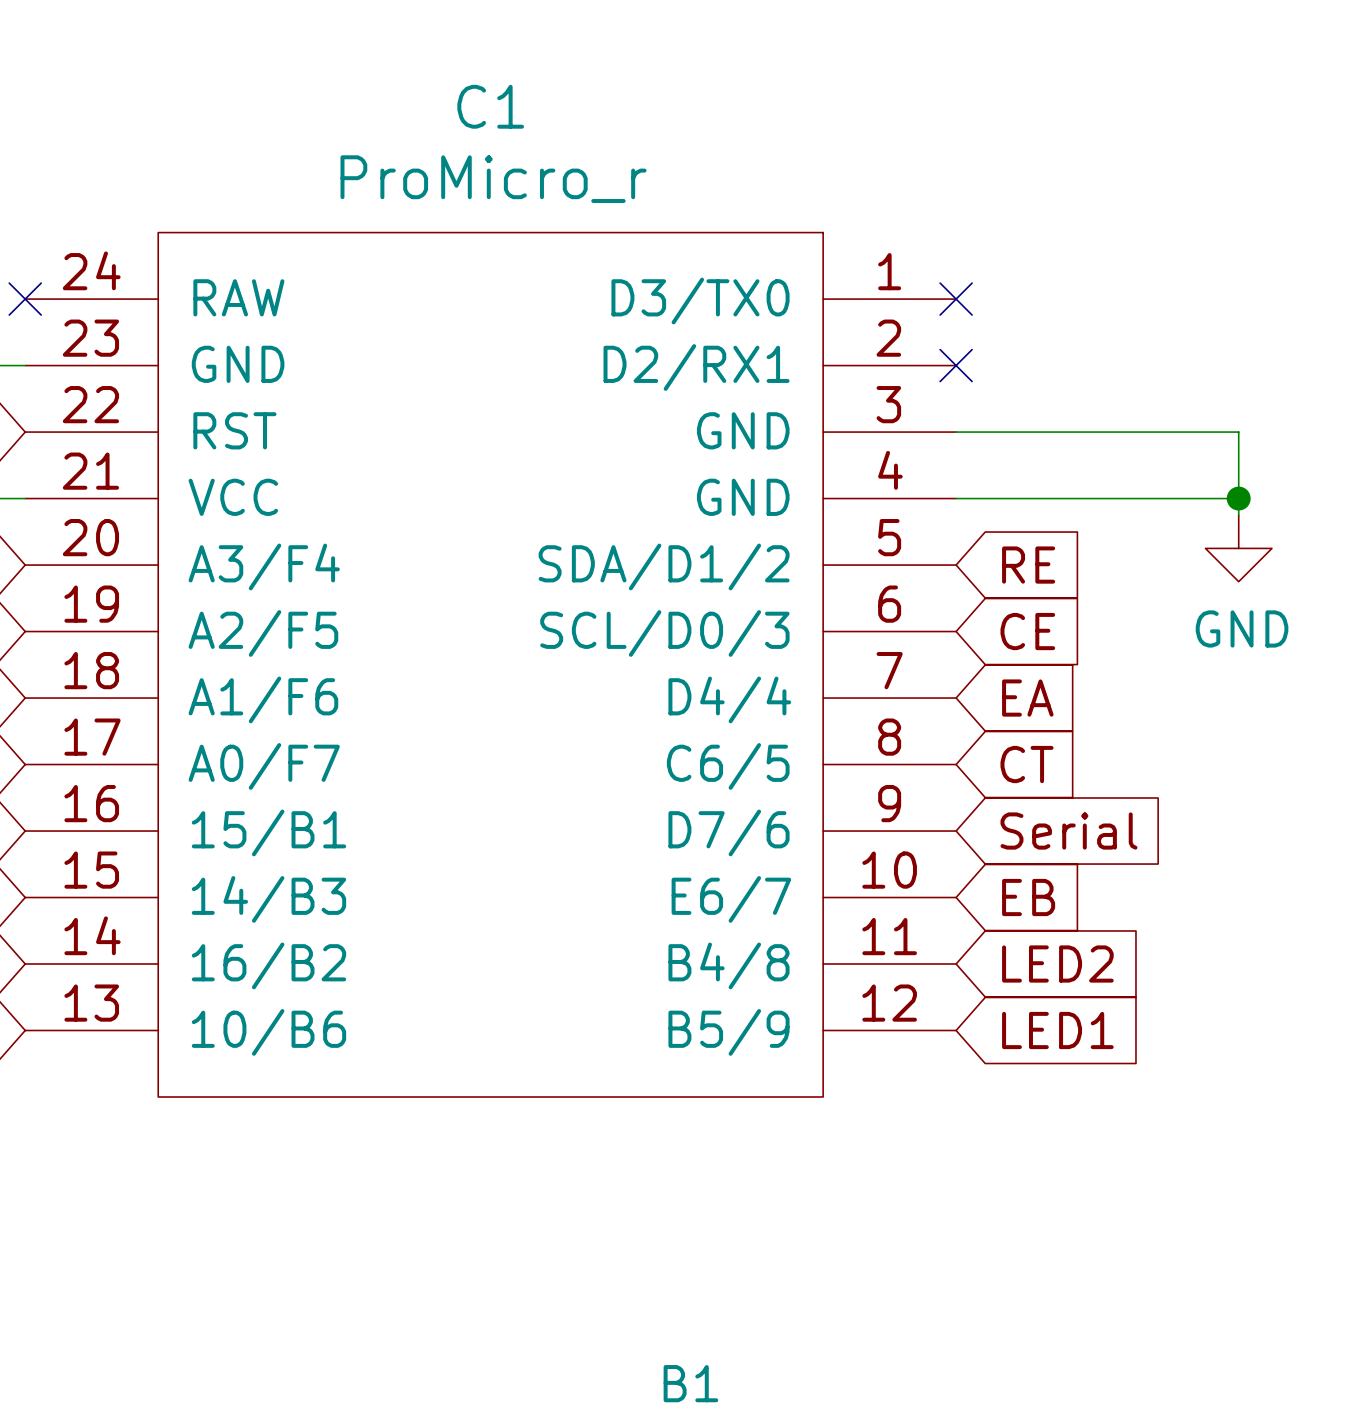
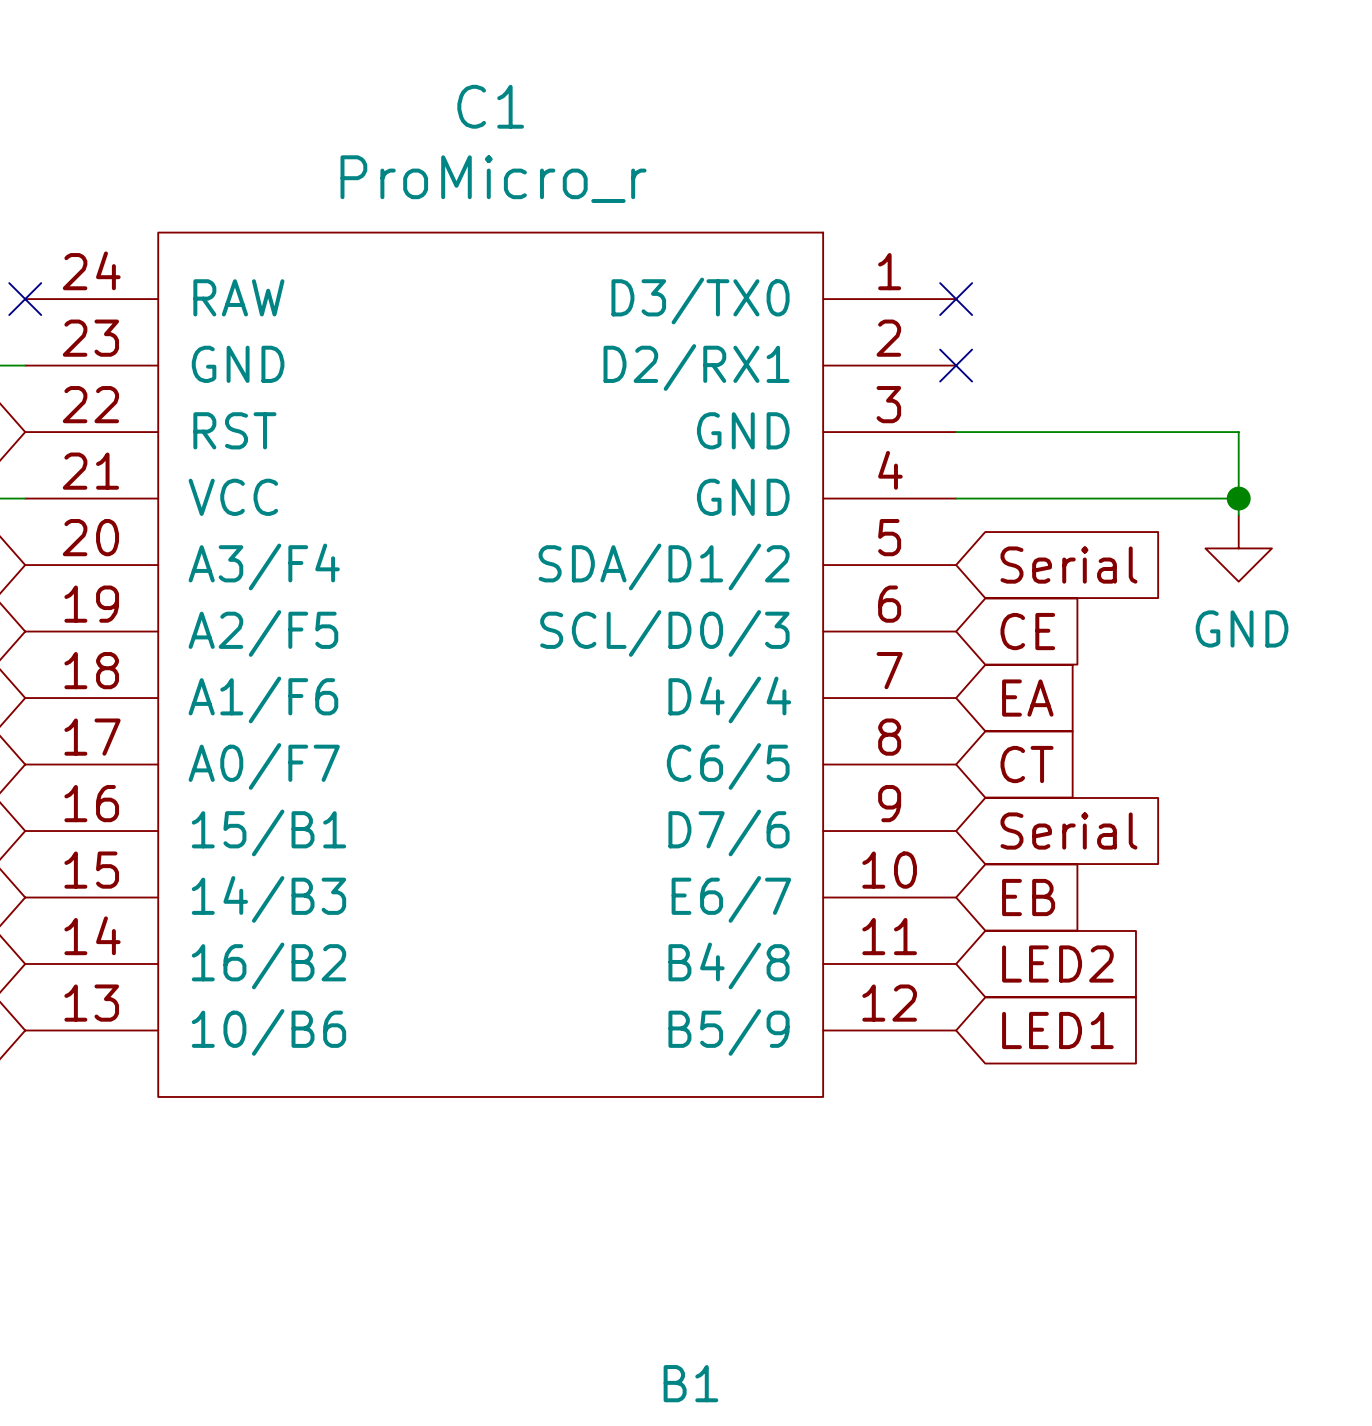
global label: RE (1028, 565) -> Serial (1068, 565)

